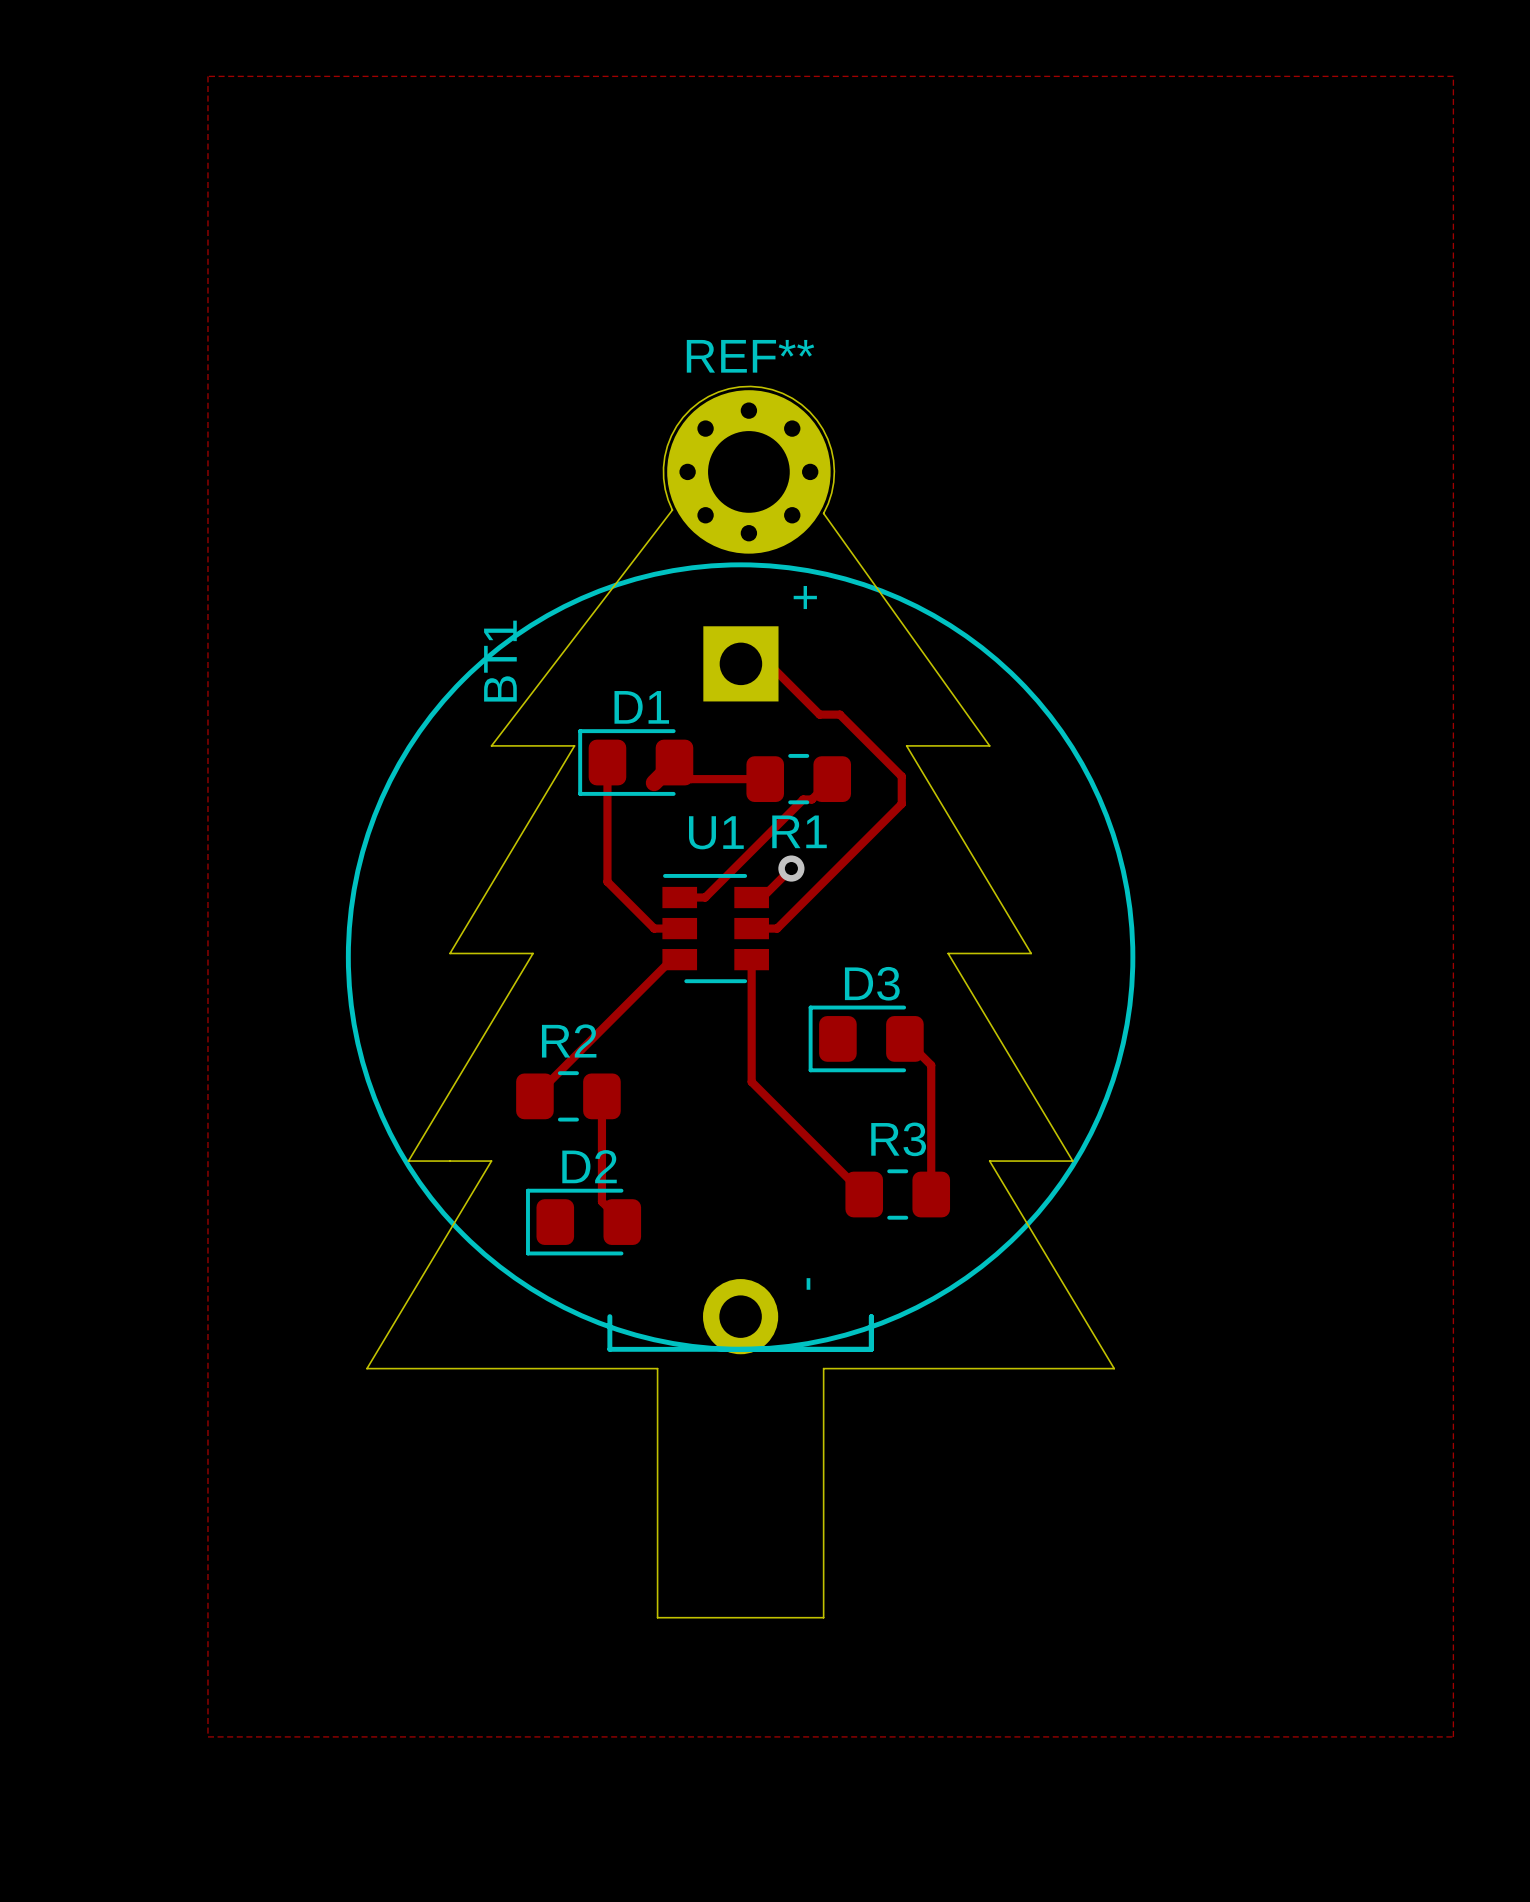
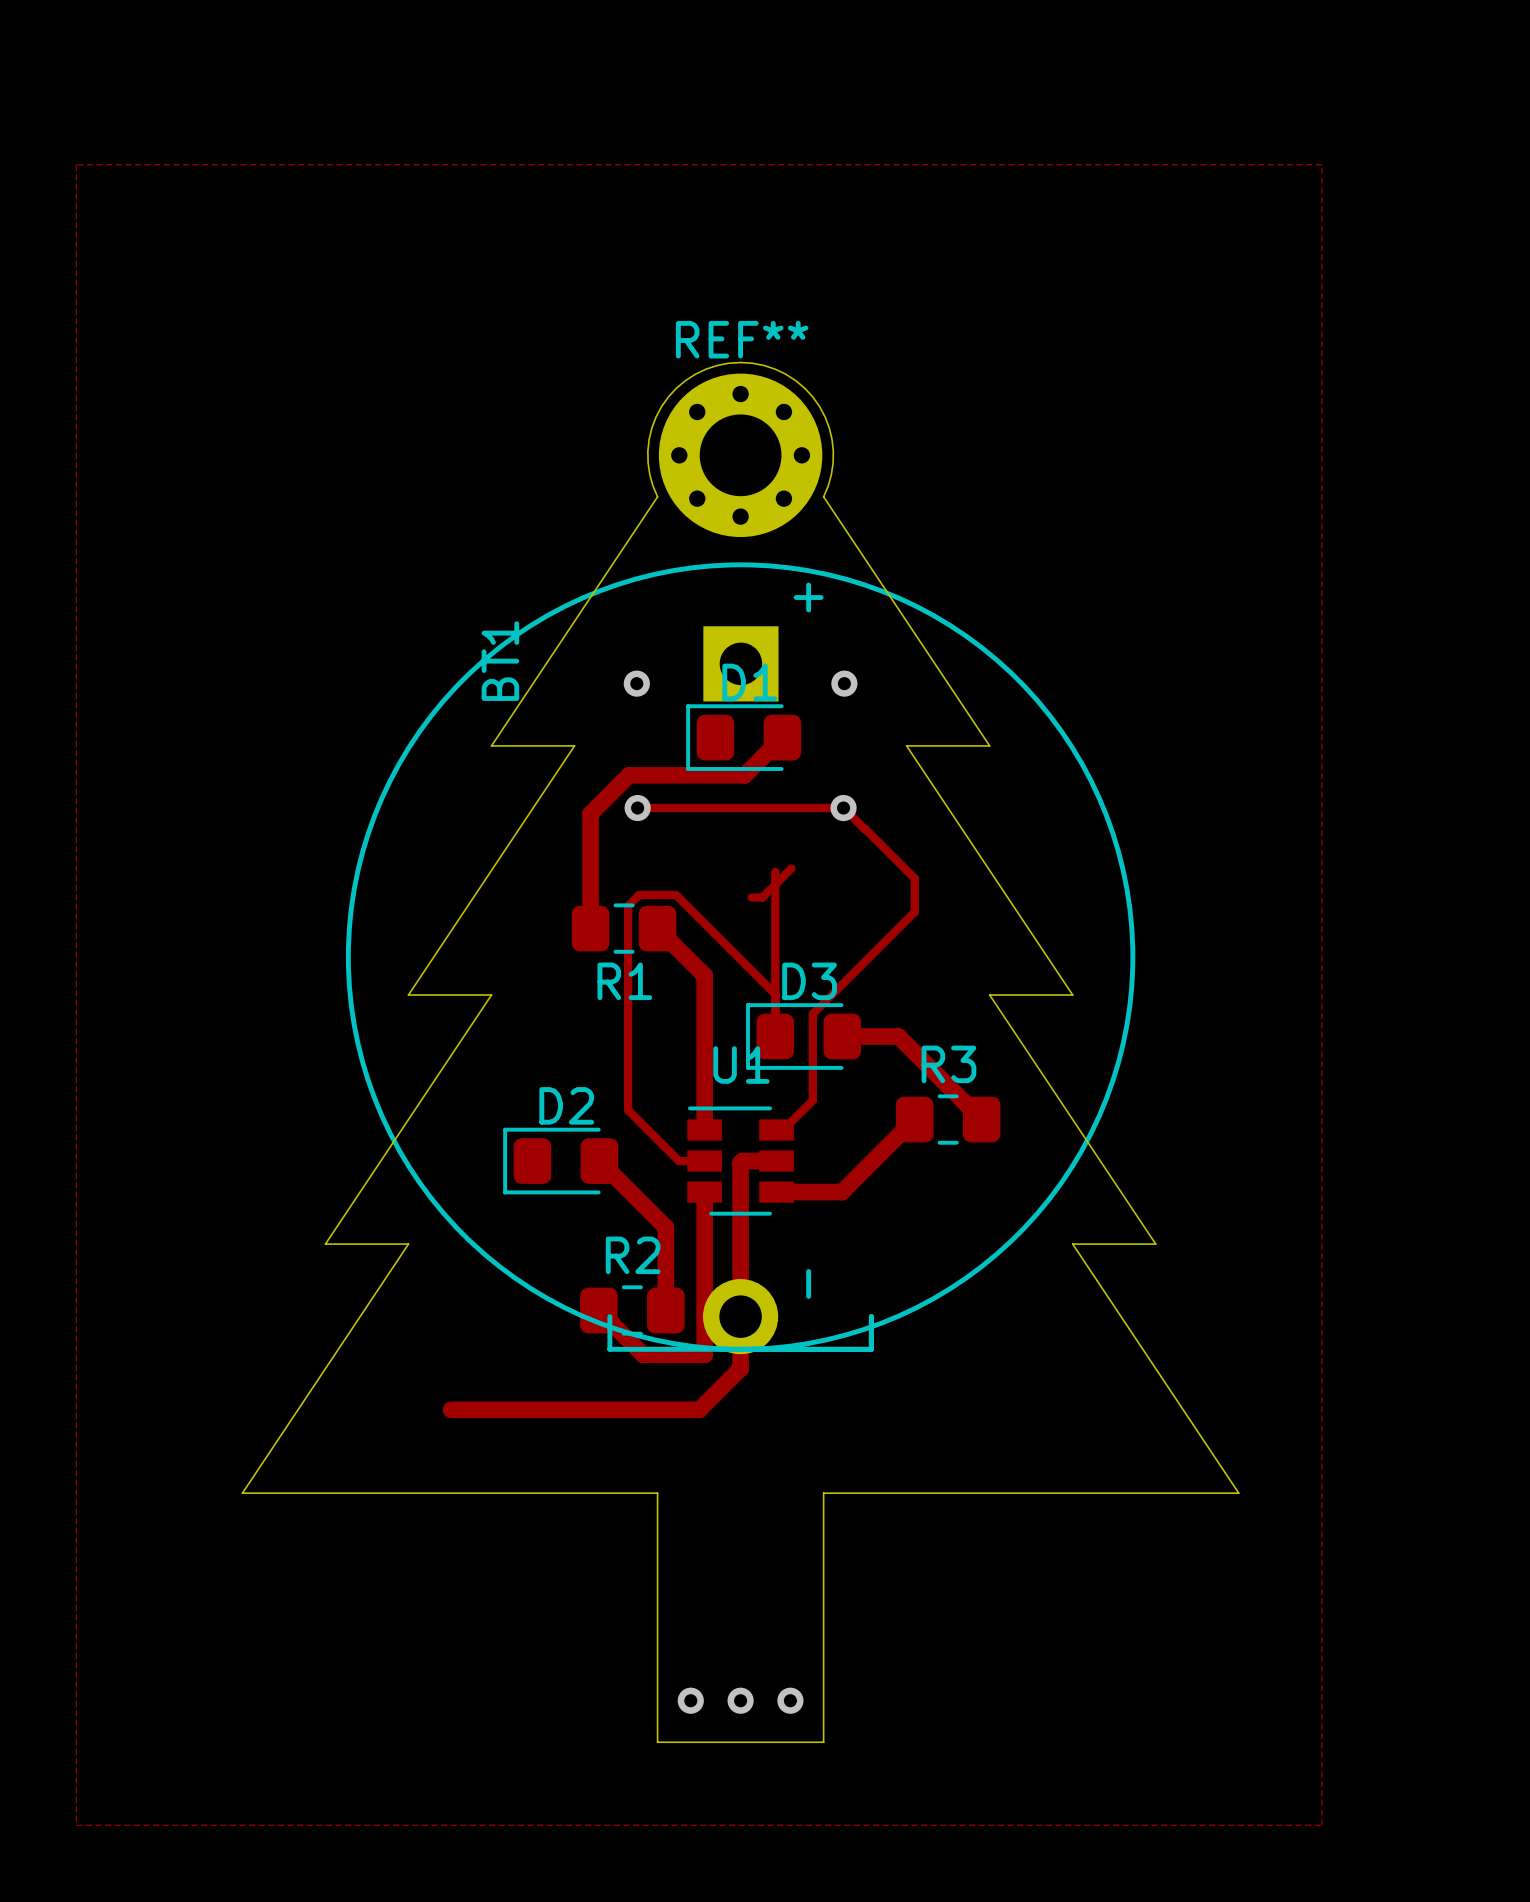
zone outline: (207, 76) (207, 1736) (1453, 1736) (1453, 76) (207, 76) -> (76, 164) (76, 1825) (1321, 1825) (1321, 164) (76, 164)
REF** position: (748, 471) -> (740, 455)
board edge: (672, 510) (663, 478) (664, 456) (671, 435) (690, 409) (718, 392) (750, 386) (772, 389) (801, 404) (823, 429) (833, 460) (833, 482) (823, 513) (989, 745) -> (491, 745) (657, 496) (649, 474) (647, 451) (651, 427) (661, 406) (676, 388) (695, 374) (717, 365) (740, 362) (763, 365) (785, 374) (804, 388) (819, 406) (829, 427) (833, 451) (831, 474) (823, 496) (989, 745)
board edge: (672, 510) (491, 745) -> none
track: (740, 663) (768, 663) (819, 714) (839, 714) (901, 776) (901, 803) (777, 928) (751, 928) -> none
via: none -> (636, 683)
via: none -> (844, 683)
track: none -> (782, 737) (744, 775) (629, 775) (590, 813) (590, 928)
board edge: (574, 745) (450, 953) (533, 953) (408, 1161) (491, 1161) (366, 1368) (657, 1368) (657, 1493) -> (574, 745) (408, 995) (491, 995) (325, 1244) (408, 1244) (242, 1493) (657, 1493)
board edge: (906, 745) (1031, 953) (948, 953) (1072, 1161) (989, 1161) (1114, 1368) (823, 1368) (823, 1493) -> (906, 745) (1072, 995) (989, 995) (1155, 1244) (1072, 1244) (1238, 1493) (823, 1493)
track: (607, 762) (607, 881) (654, 928) (679, 928) -> none
D1 position: (635, 762) -> (743, 737)
track: (765, 779) (691, 779) (674, 762) (654, 782) -> none
R1 position: (798, 779) -> (624, 928)
track: (832, 779) (811, 799) (803, 799) (705, 897) (679, 897) -> none
track: none -> (637, 808) (843, 808) (864, 828)
via: none -> (637, 808)
track: none -> (865, 828) (914, 878) (914, 911) (812, 1013) (812, 1100) (783, 1130) (776, 1130)
via position: (791, 868) -> (843, 808)
track: none -> (775, 871) (775, 1036)
track: none -> (657, 928) (704, 975) (704, 1130)
U1 position: (715, 928) -> (740, 1161)
track: (679, 959) (671, 959) (534, 1096) -> none
track: (751, 959) (751, 1081) (864, 1194) -> none
track: none -> (775, 994) (676, 895) (639, 895) (628, 906) (628, 1110) (679, 1161) (704, 1161)
track: none -> (842, 1036) (898, 1036) (981, 1119)
D3 position: (866, 1038) -> (803, 1036)
track: (904, 1038) (931, 1065) (931, 1194) -> none
R2 position: (568, 1096) -> (632, 1310)
track: (601, 1096) (601, 1201) (622, 1222) -> none
track: none -> (914, 1119) (842, 1192) (776, 1192)
track: none -> (599, 1161) (665, 1227) (665, 1310)
track: none -> (776, 1161) (742, 1161) (740, 1163) (740, 1368) (699, 1409) (450, 1409)
track: none -> (697, 1192) (704, 1192) (704, 1354) (643, 1354) (598, 1310)
R3 position: (897, 1194) -> (948, 1119)
D2 position: (583, 1222) -> (560, 1161)
board edge: (657, 1617) (823, 1617) -> (657, 1617) (657, 1742) (823, 1742) (823, 1617)
via: none -> (690, 1700)
via: none -> (740, 1700)
via: none -> (790, 1700)

